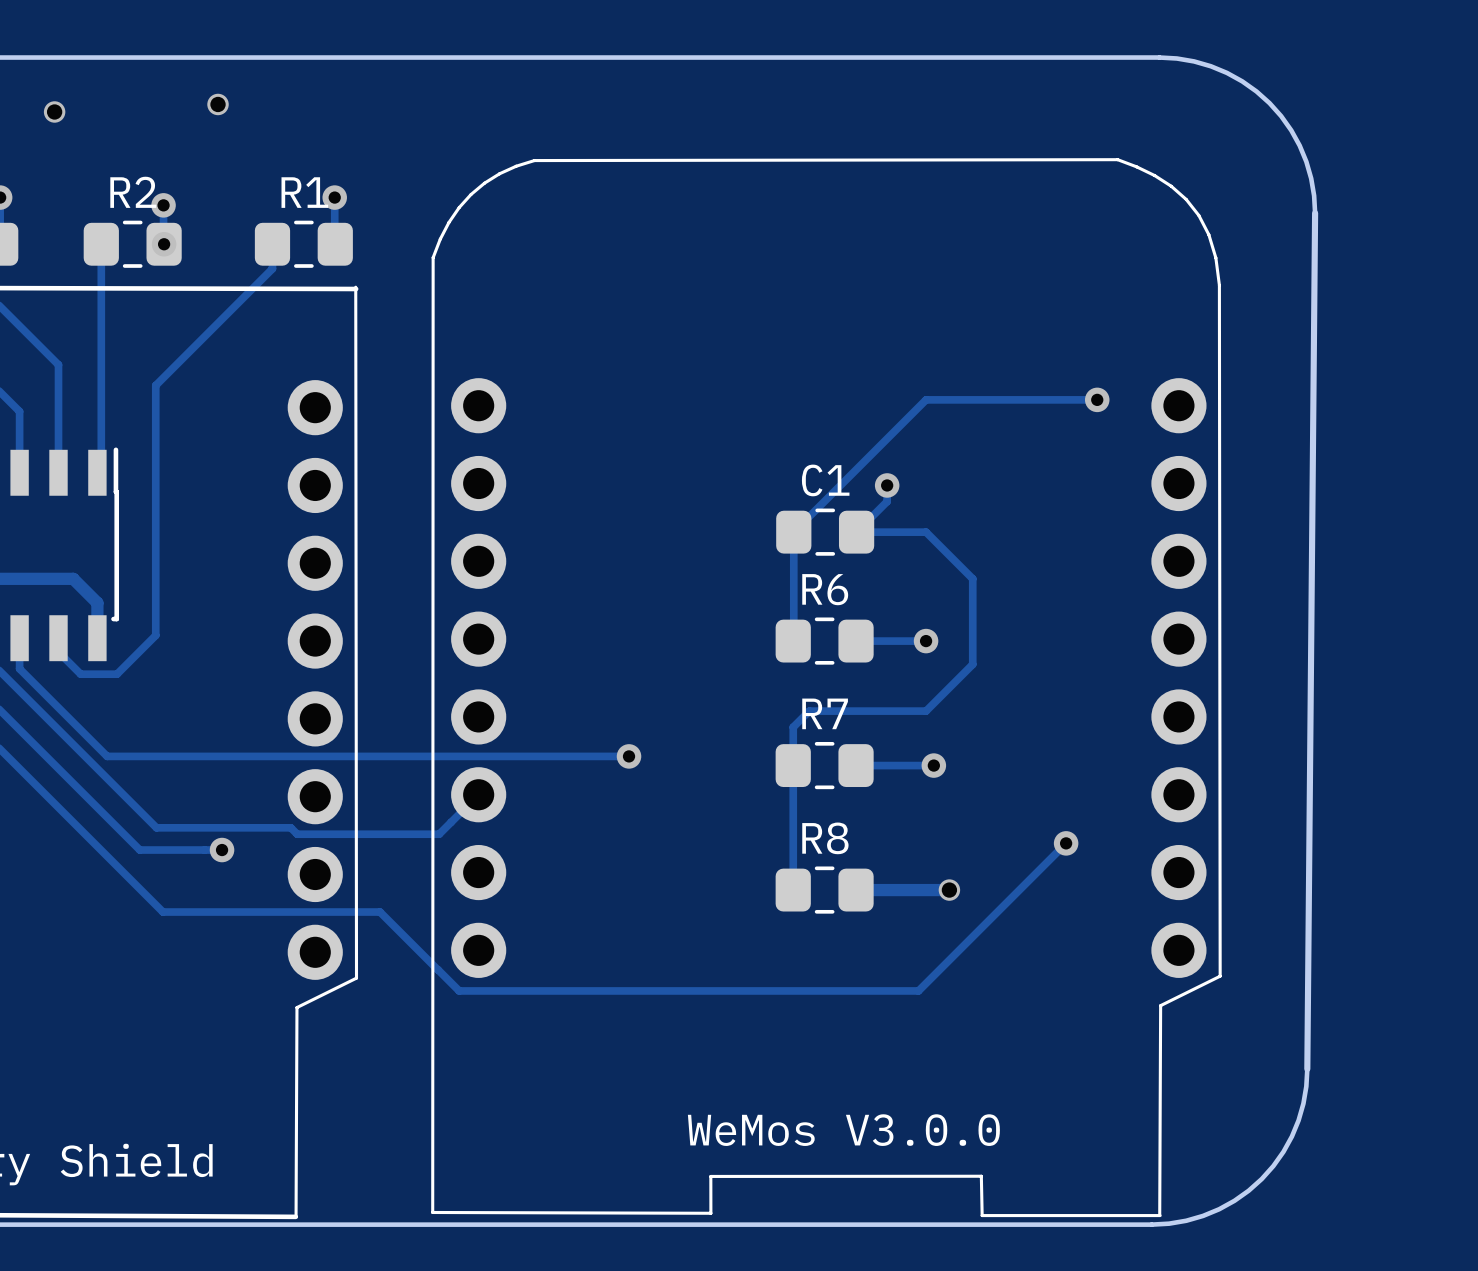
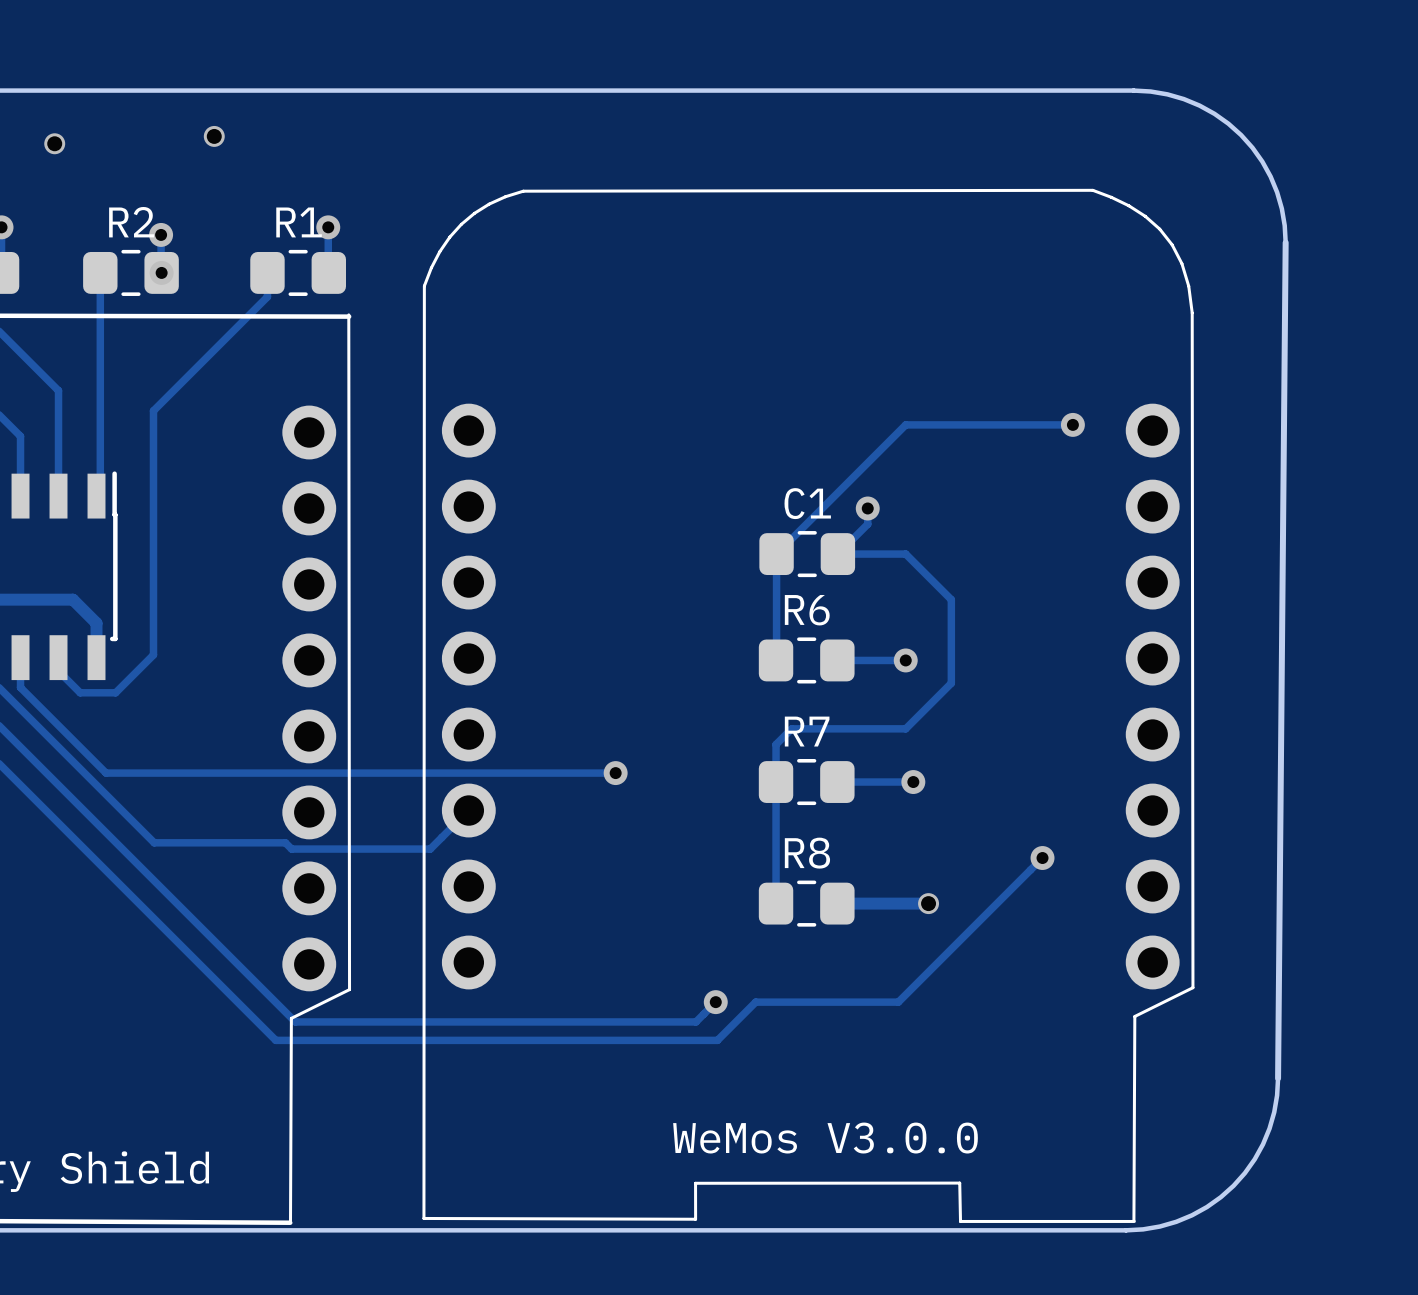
track: (222, 850) (139, 850) -> (715, 1002) (695, 1021) (295, 1021) (137, 864)
via: (222, 850) -> none
track: (162, 912) (380, 912) (459, 990) (772, 990) -> (160, 925) (275, 1040) (717, 1040) (755, 1002)
via: none -> (715, 1002)

